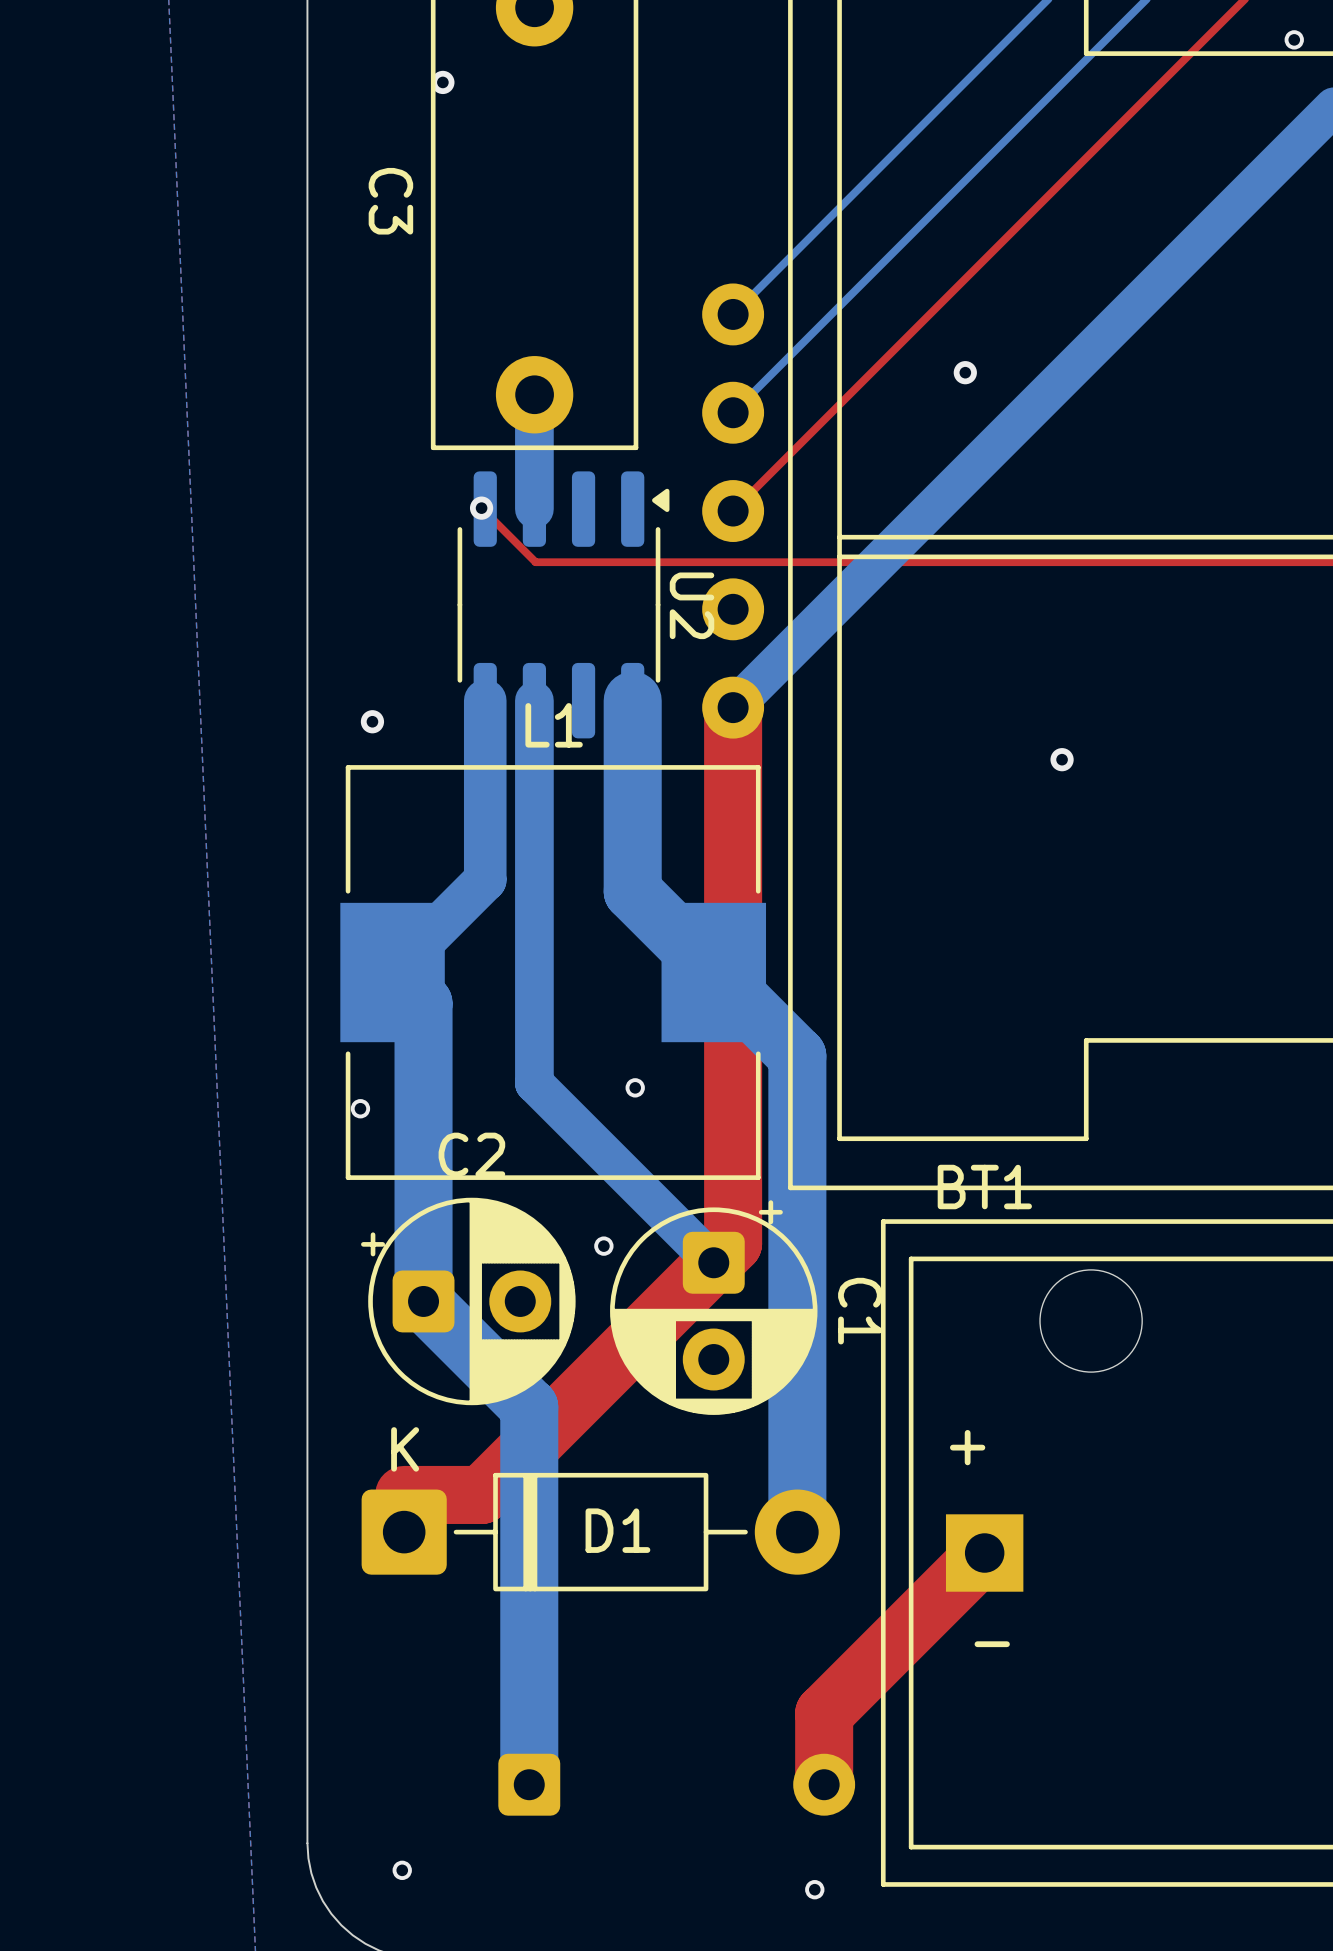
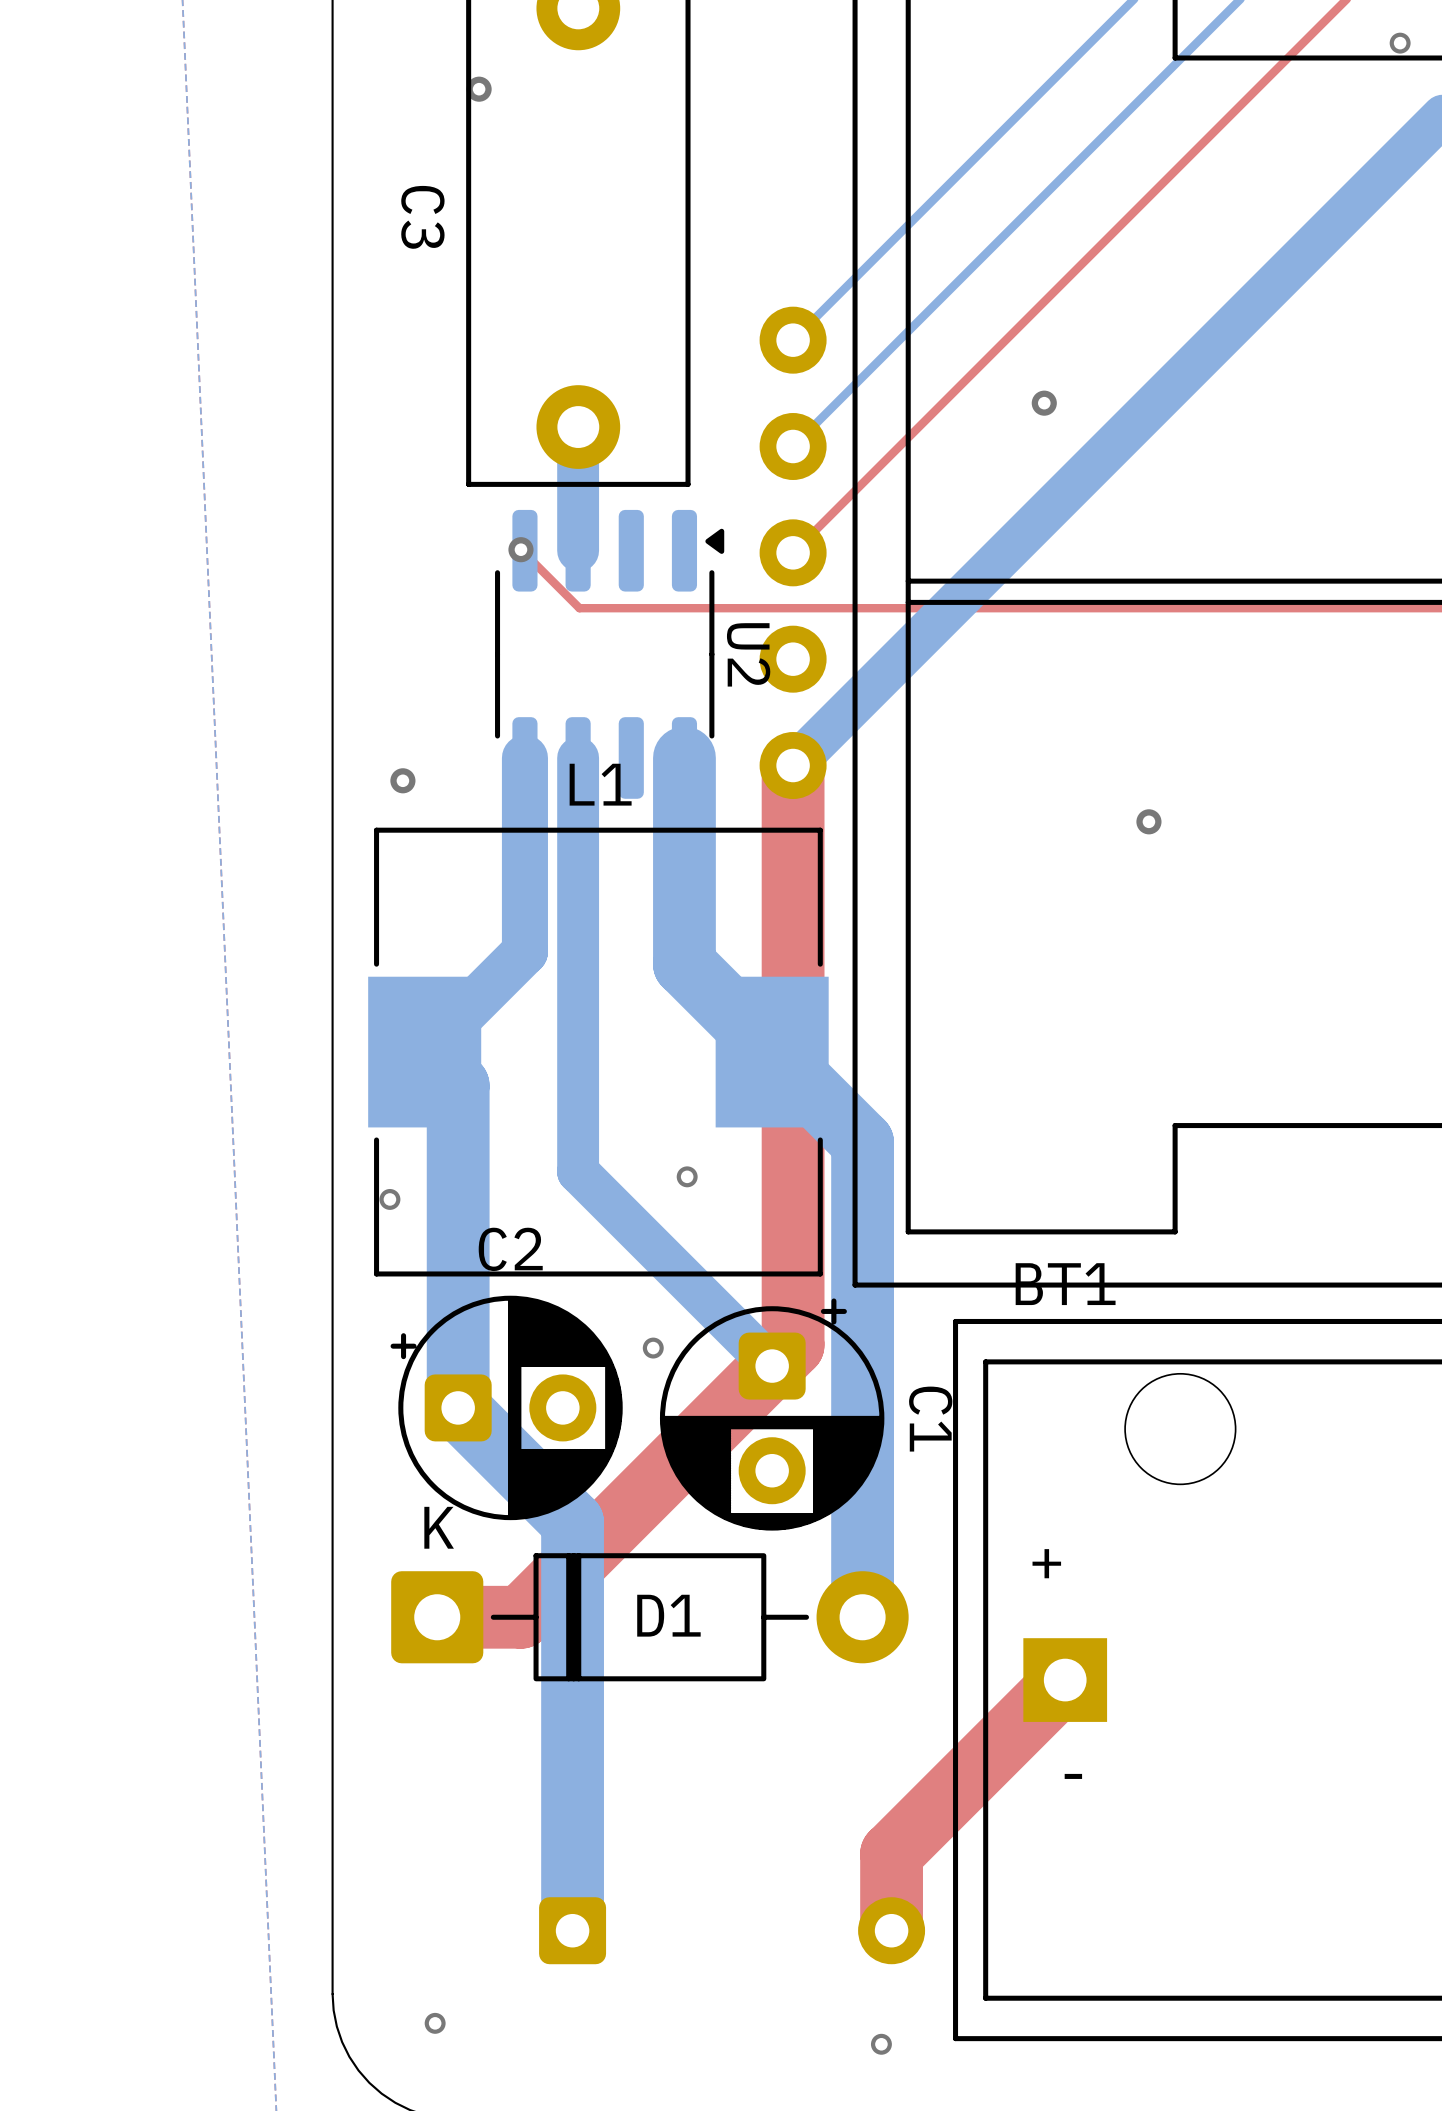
D1 position: (600, 1532) -> (649, 1617)

